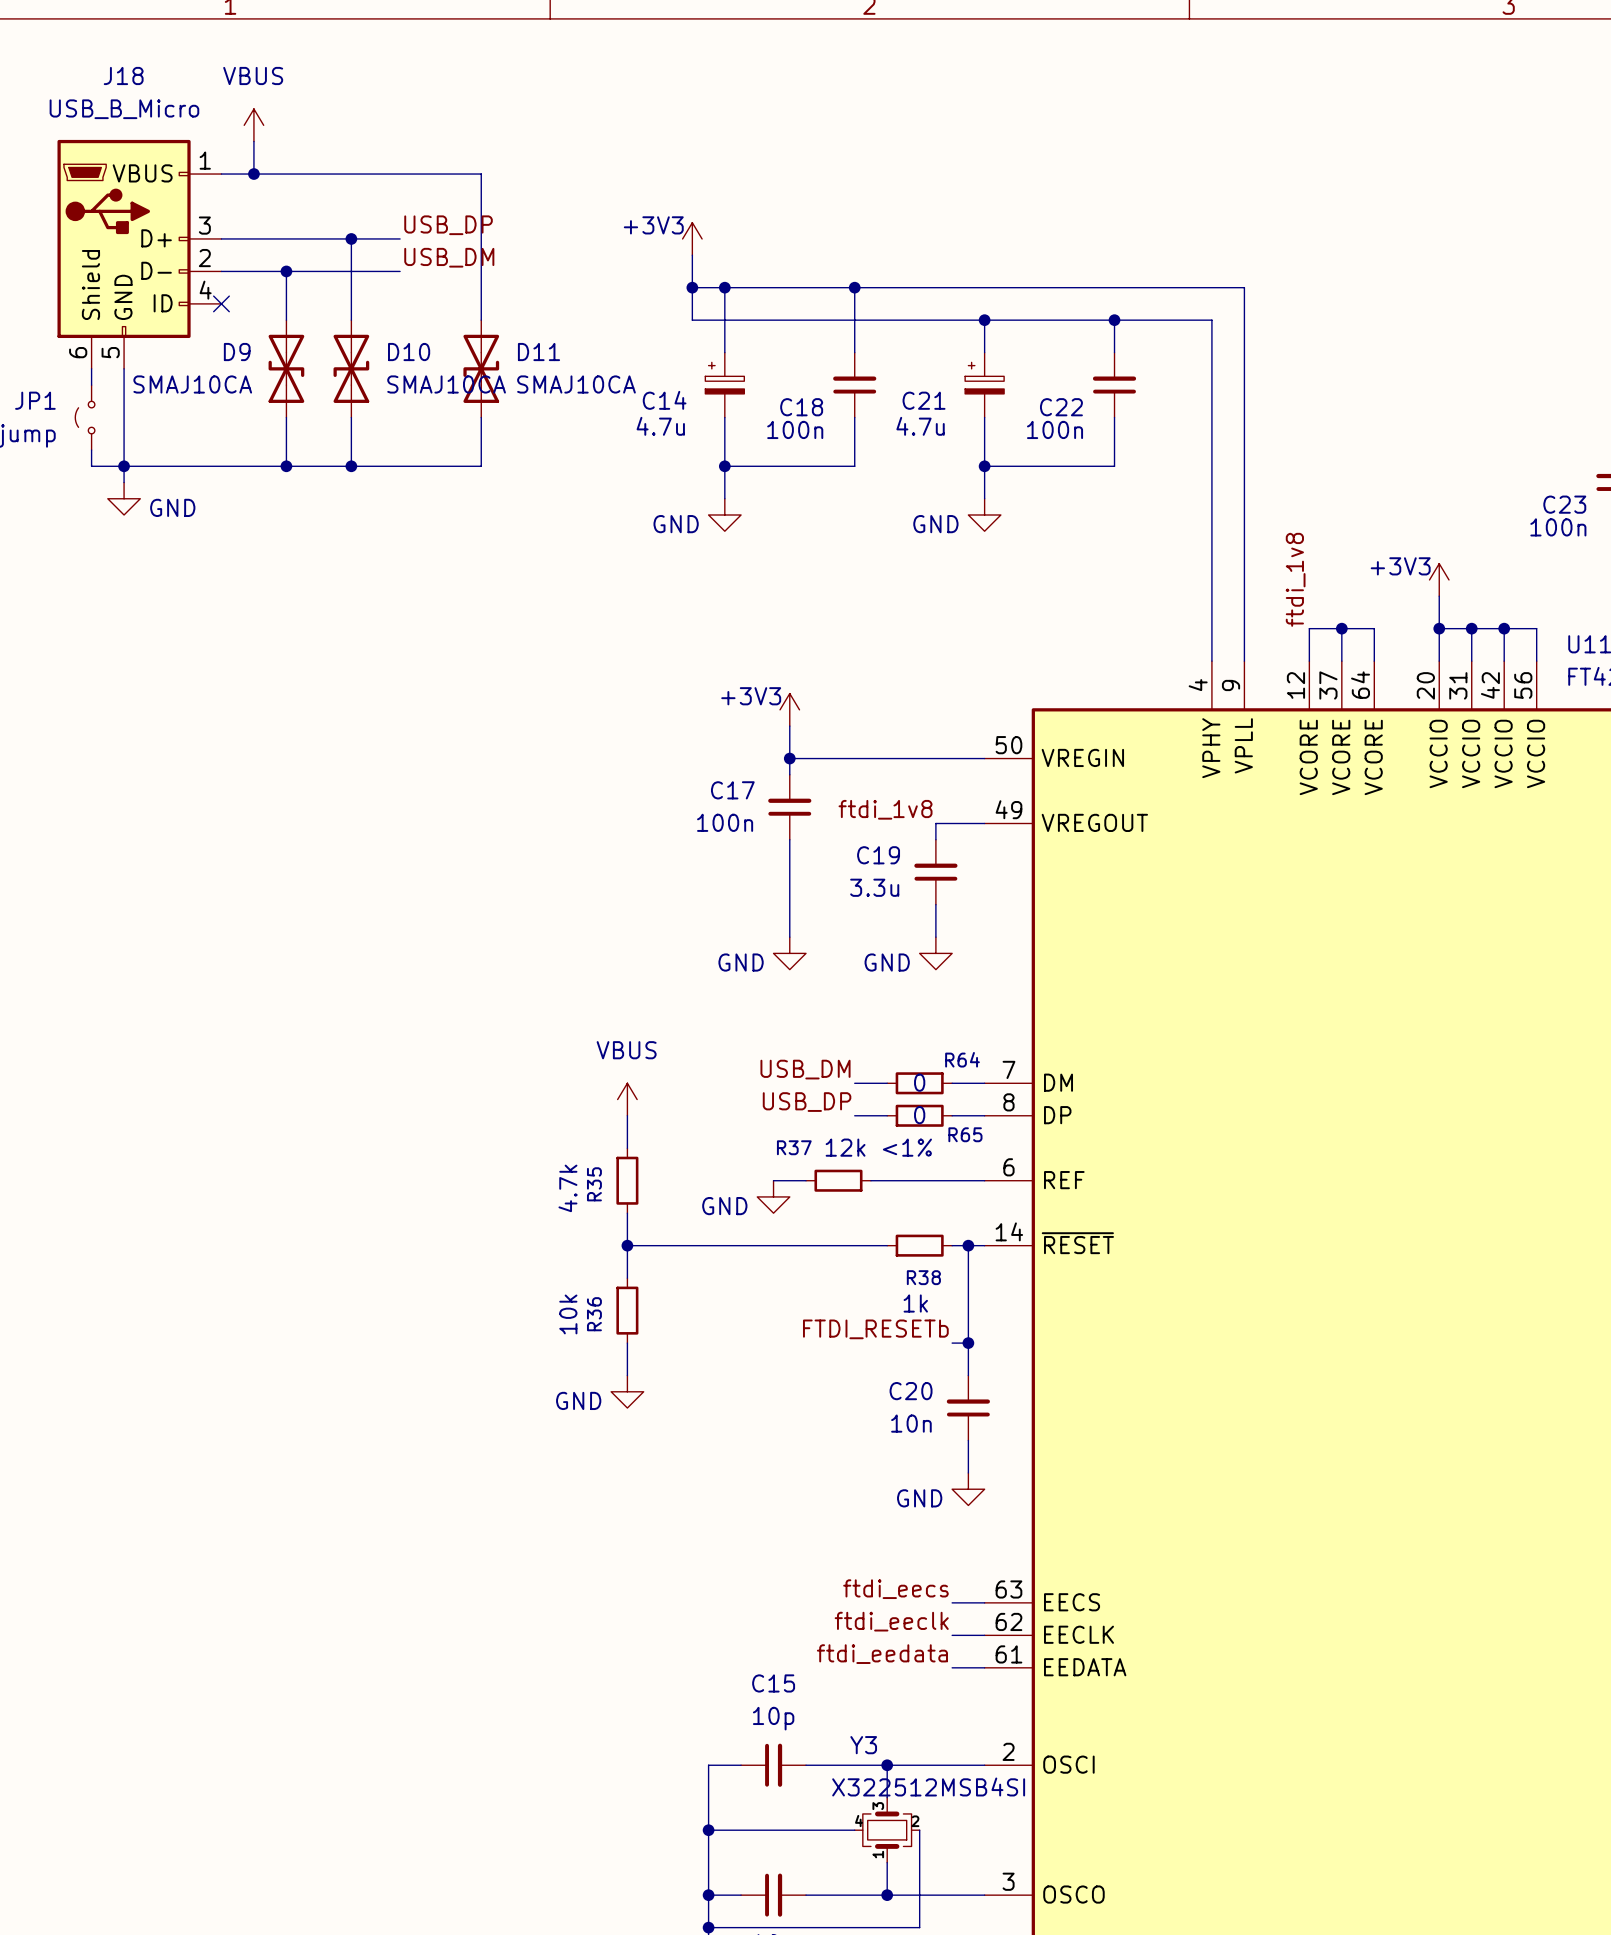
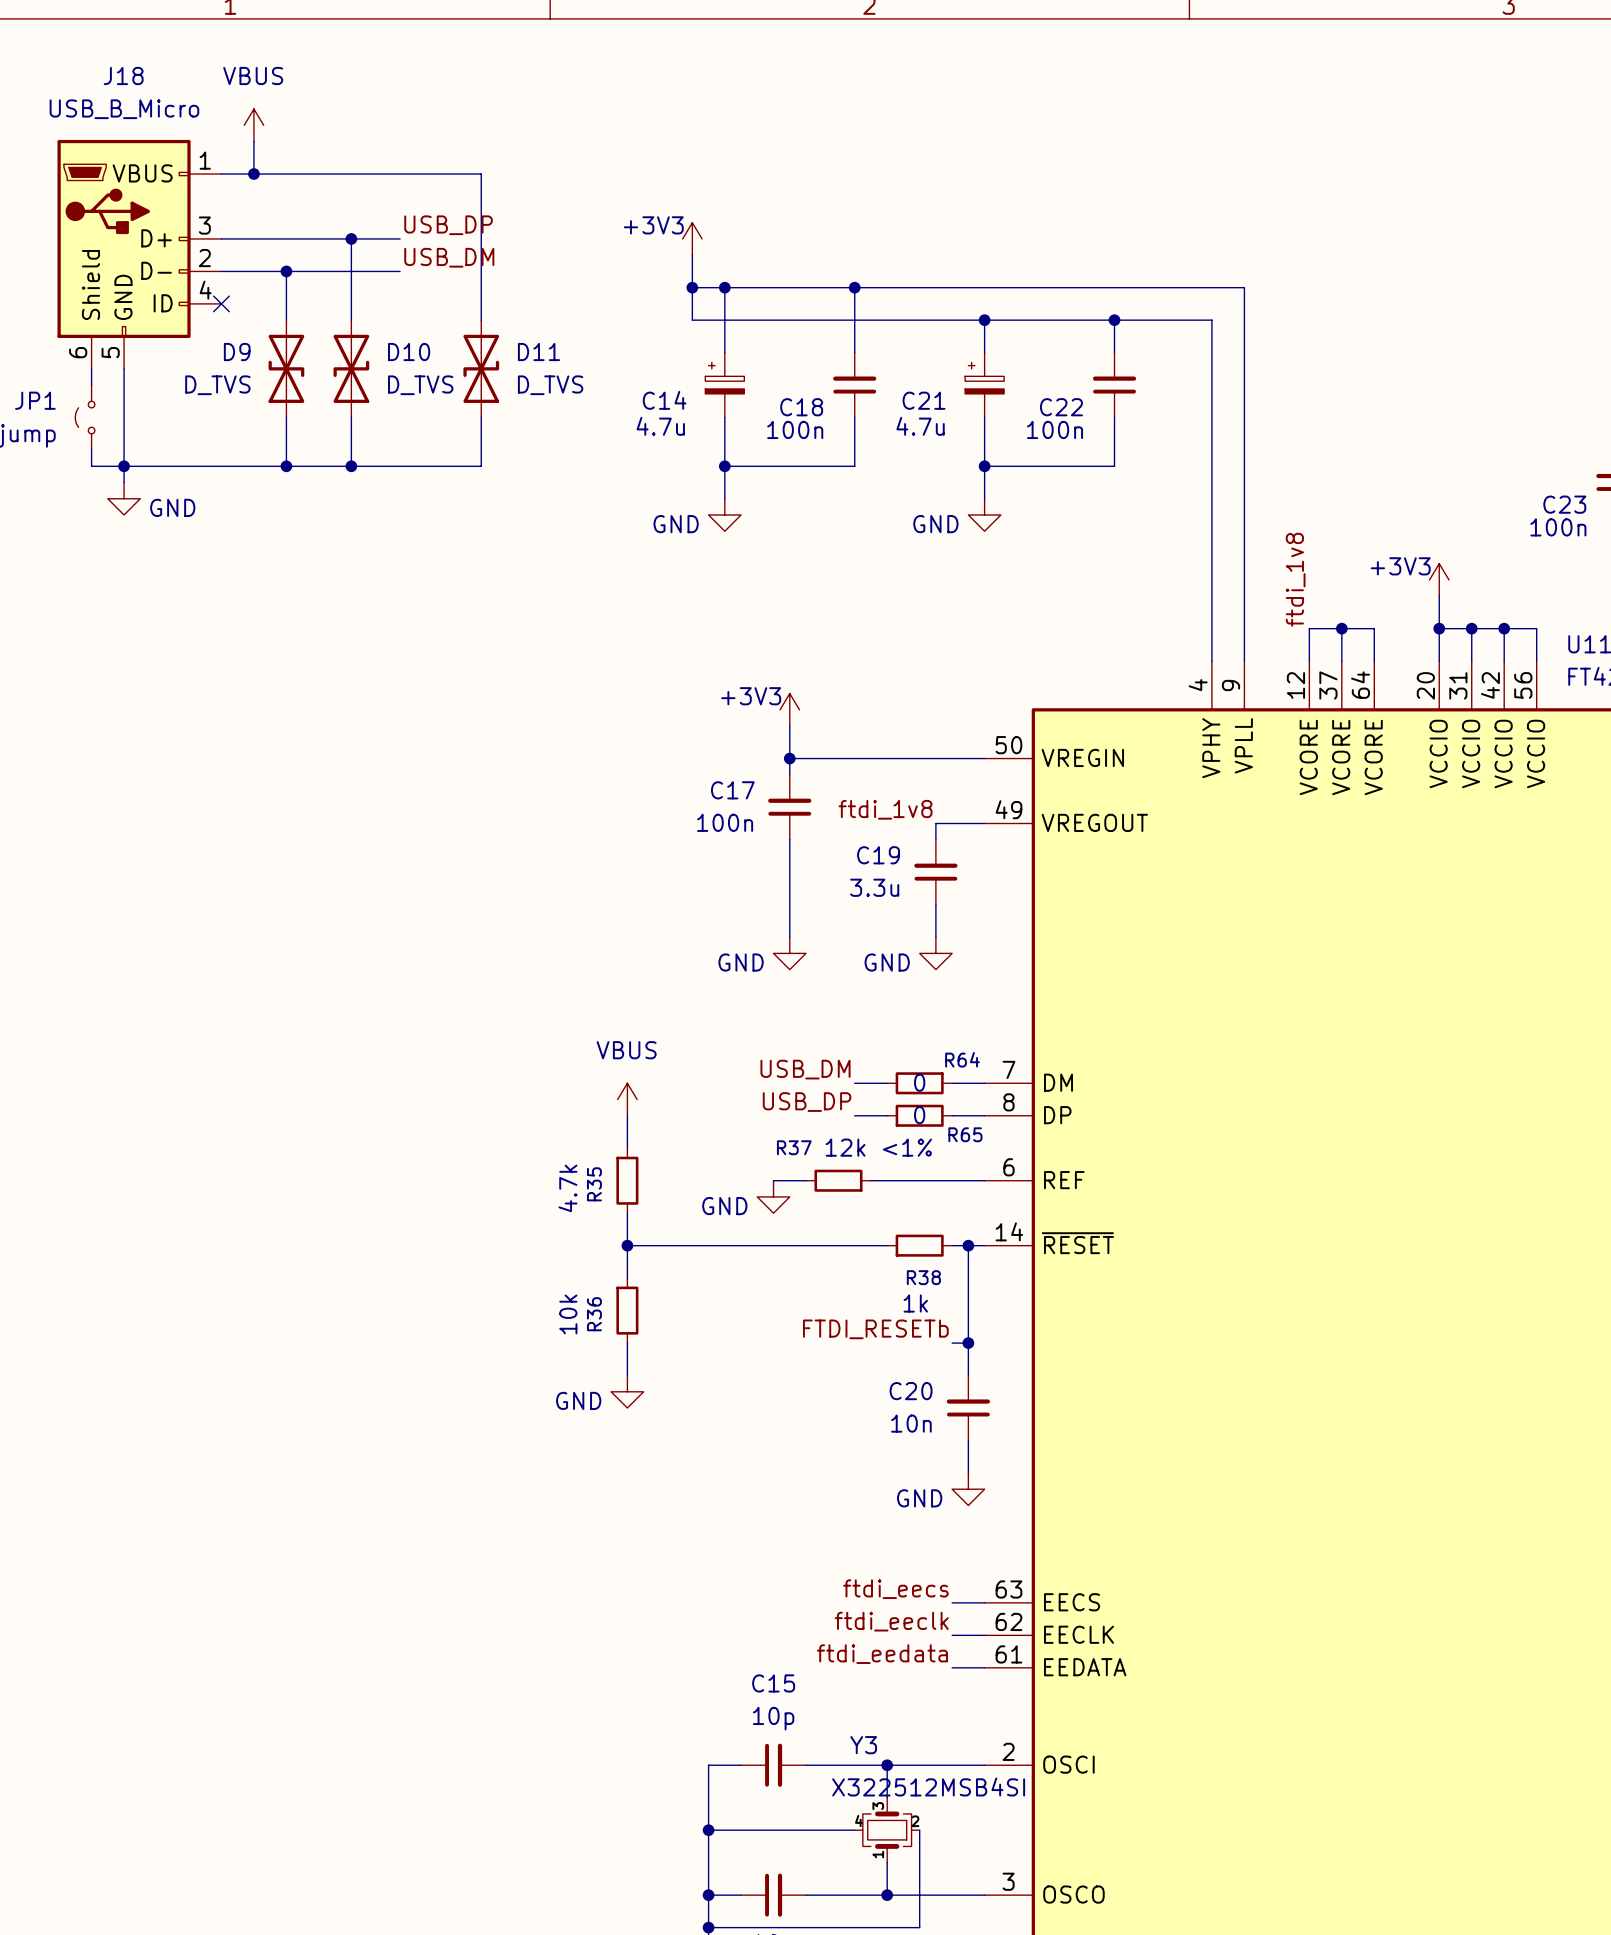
D9 value: SMAJ10CA (192, 384) -> D_TVS (217, 385)
D10 value: SMAJ10CA (446, 384) -> D_TVS (420, 385)
D11 value: SMAJ10CA (576, 384) -> D_TVS (550, 385)

